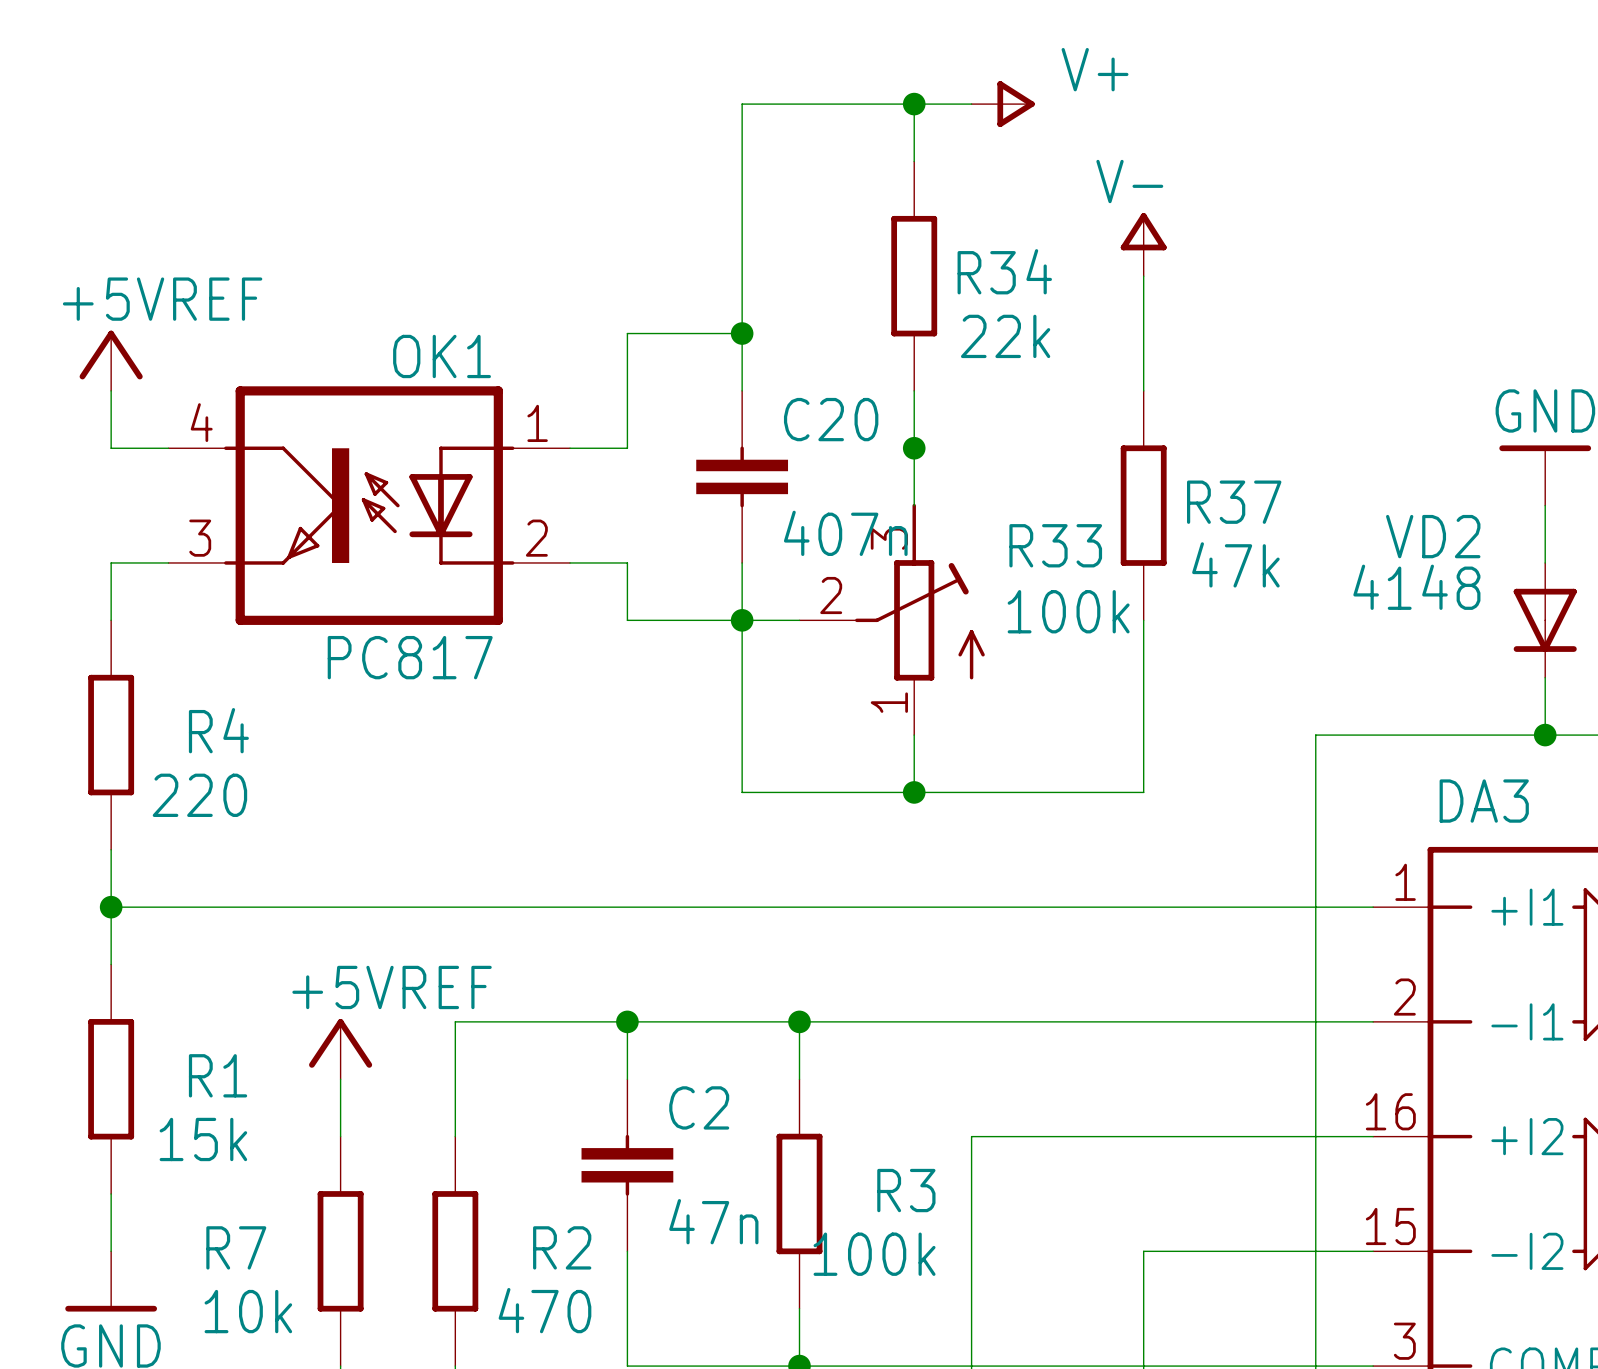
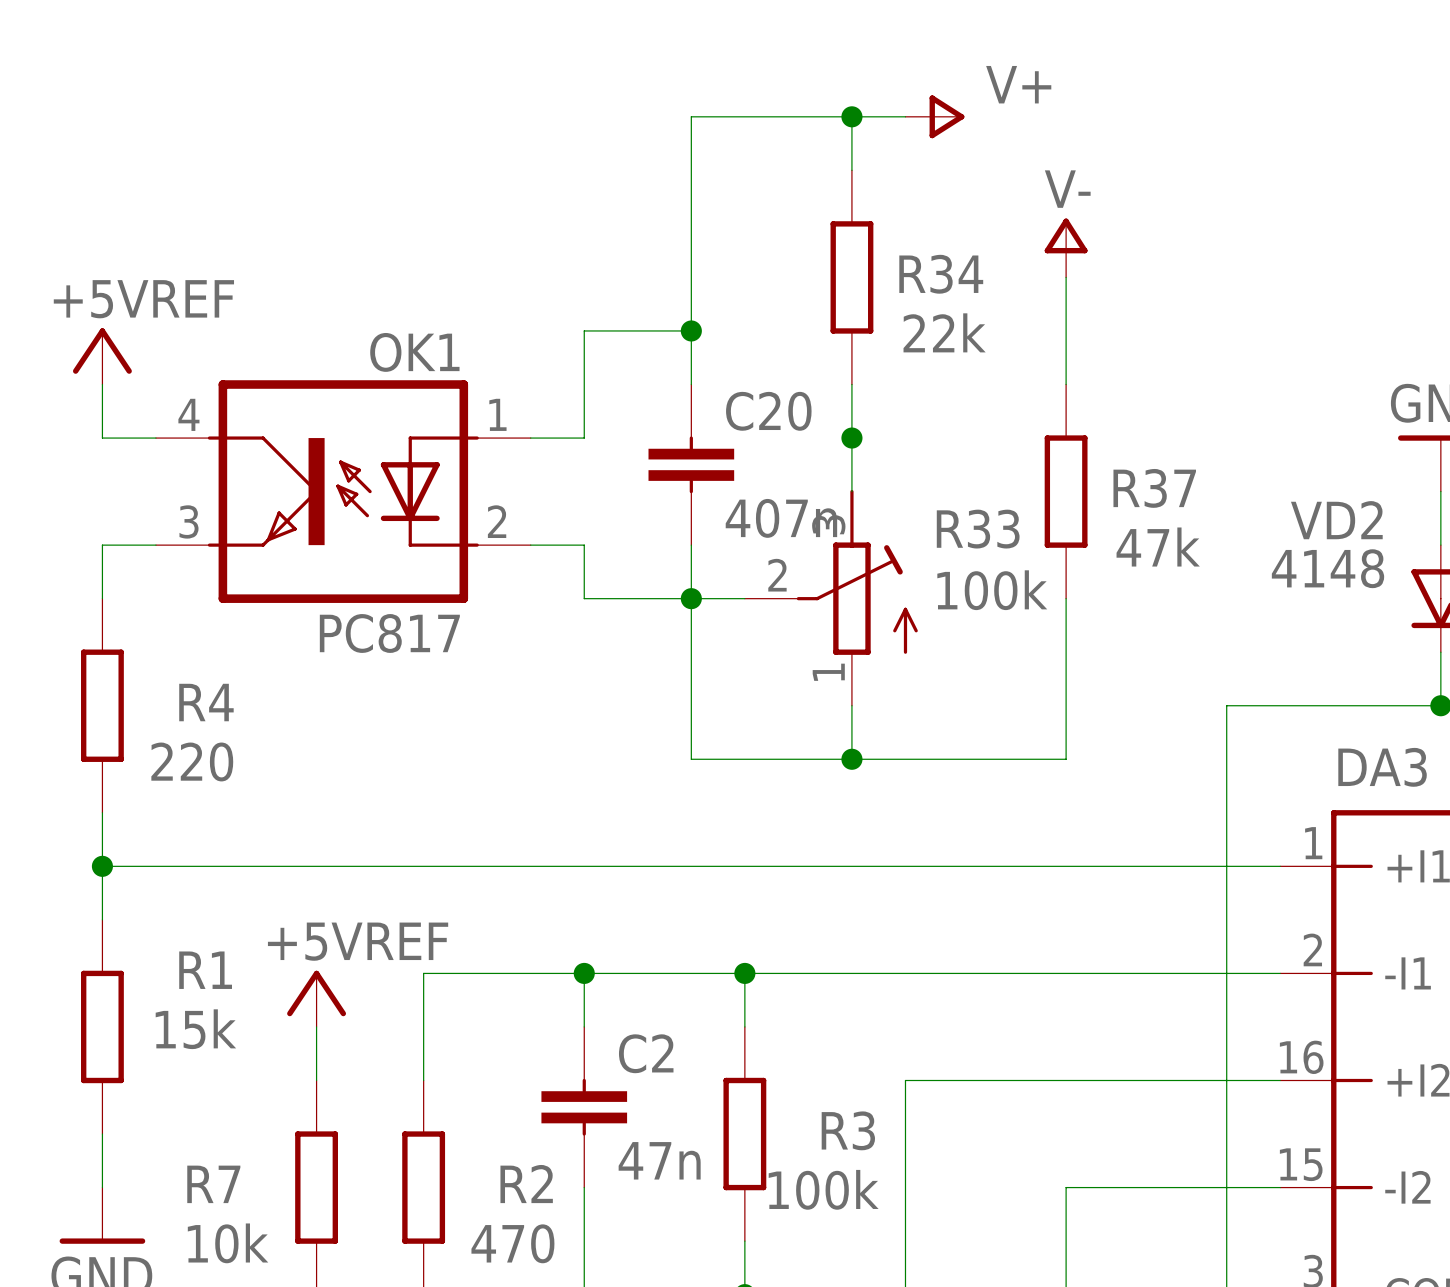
R1 name position: R1 (218, 1075) -> R1 (205, 970)
R1 value position: 15k (203, 1139) -> 15k (195, 1029)

